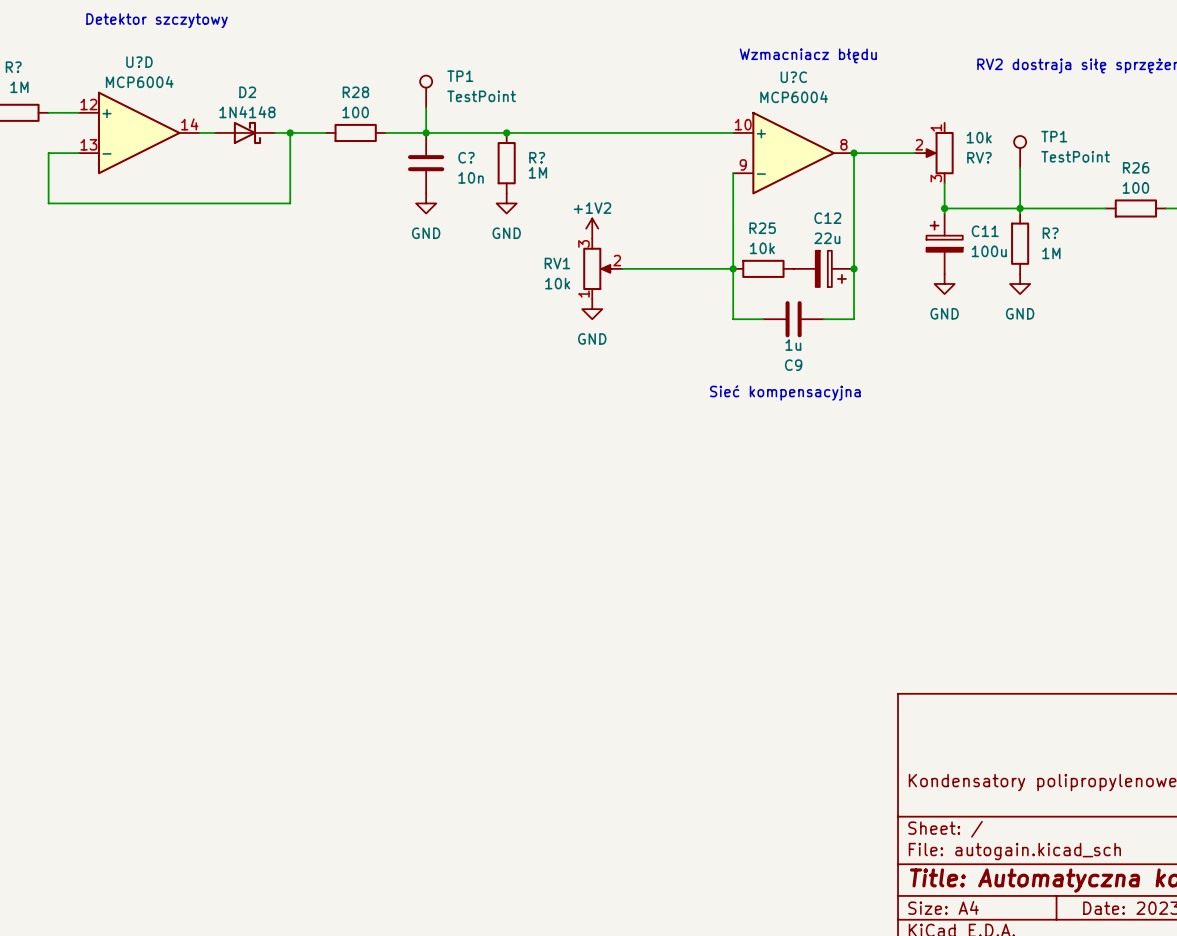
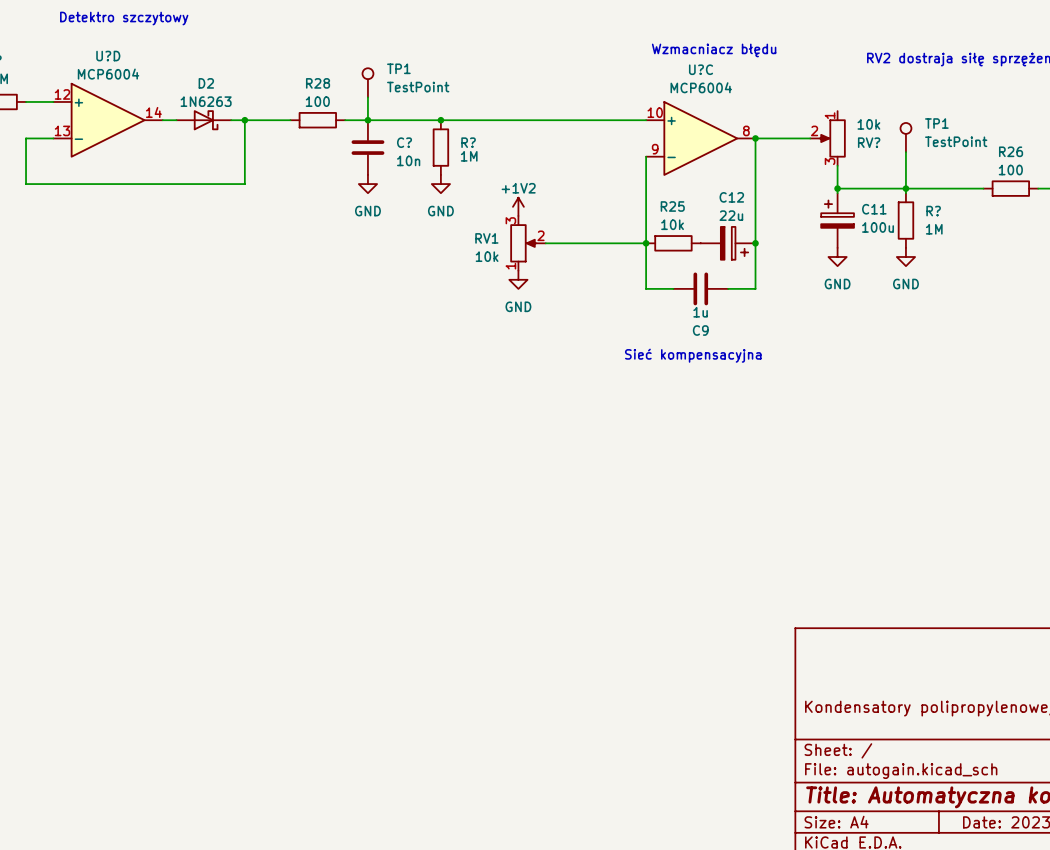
text: Detektor szczytowy (157, 20) -> Detektro szczytowy (124, 18)
D2 value: 1N4148 (247, 112) -> 1N6263 (206, 101)
R28 position: (355, 132) -> (317, 120)

